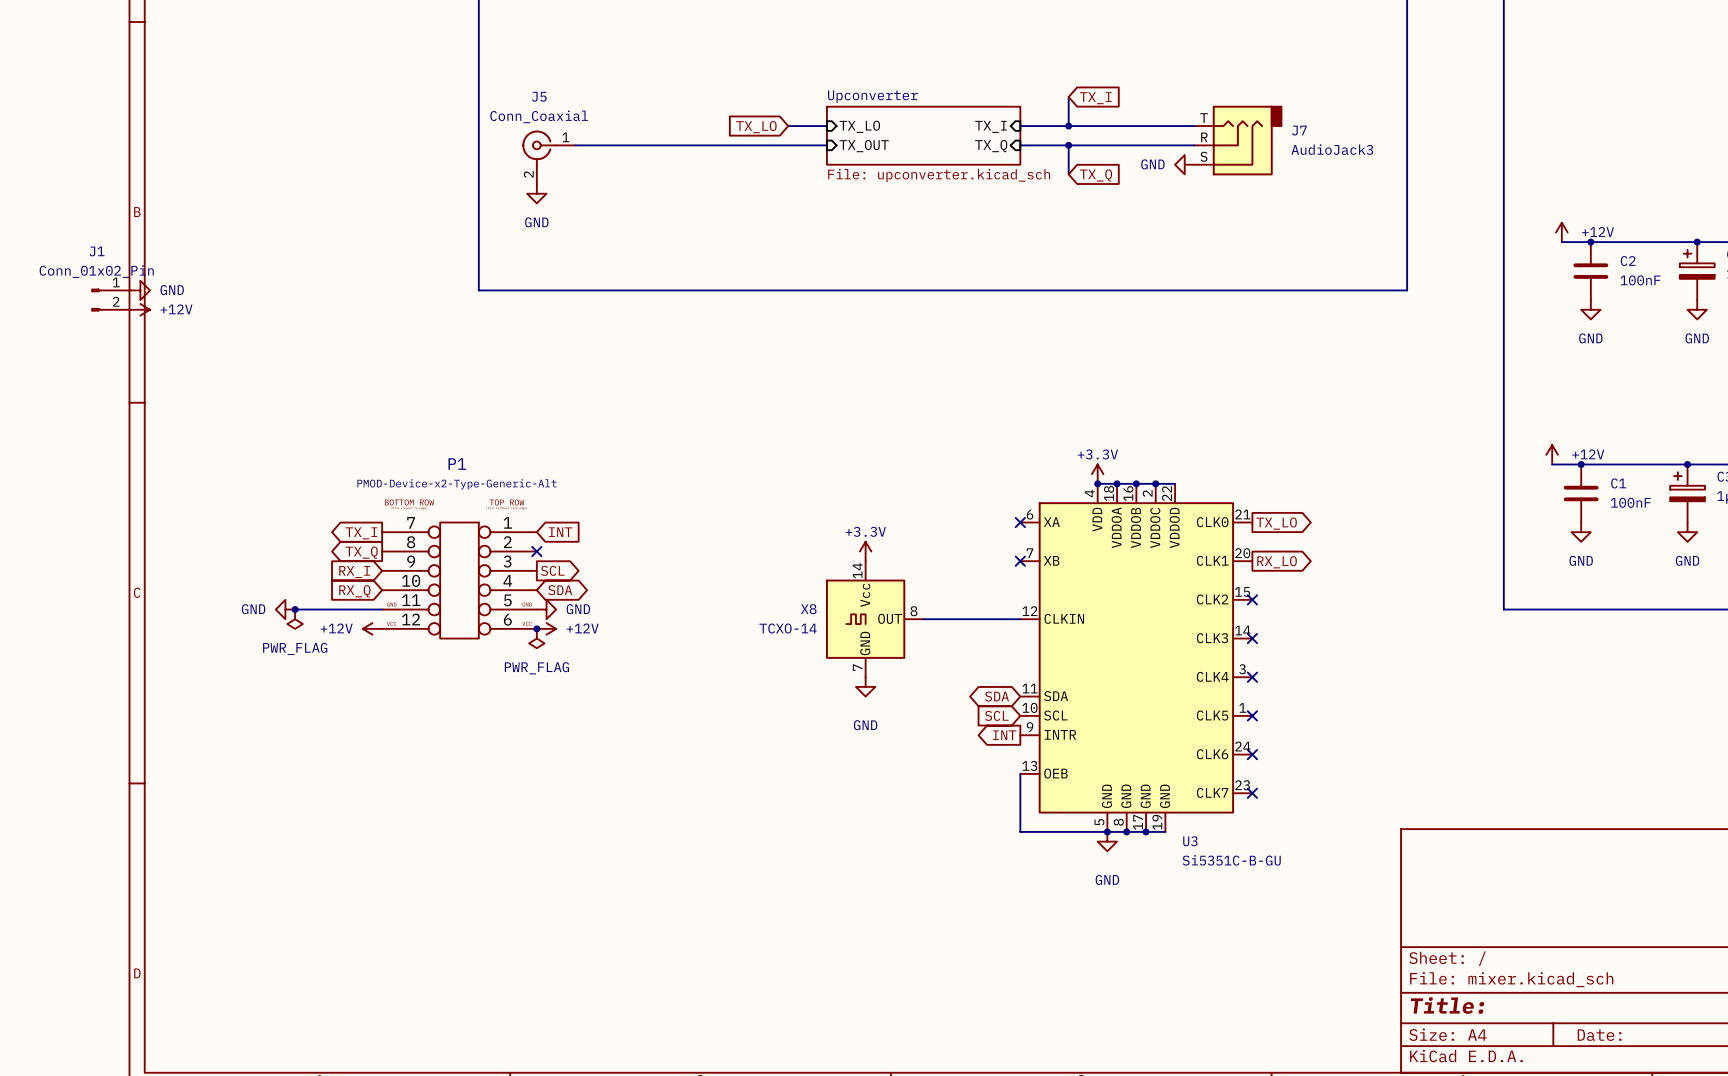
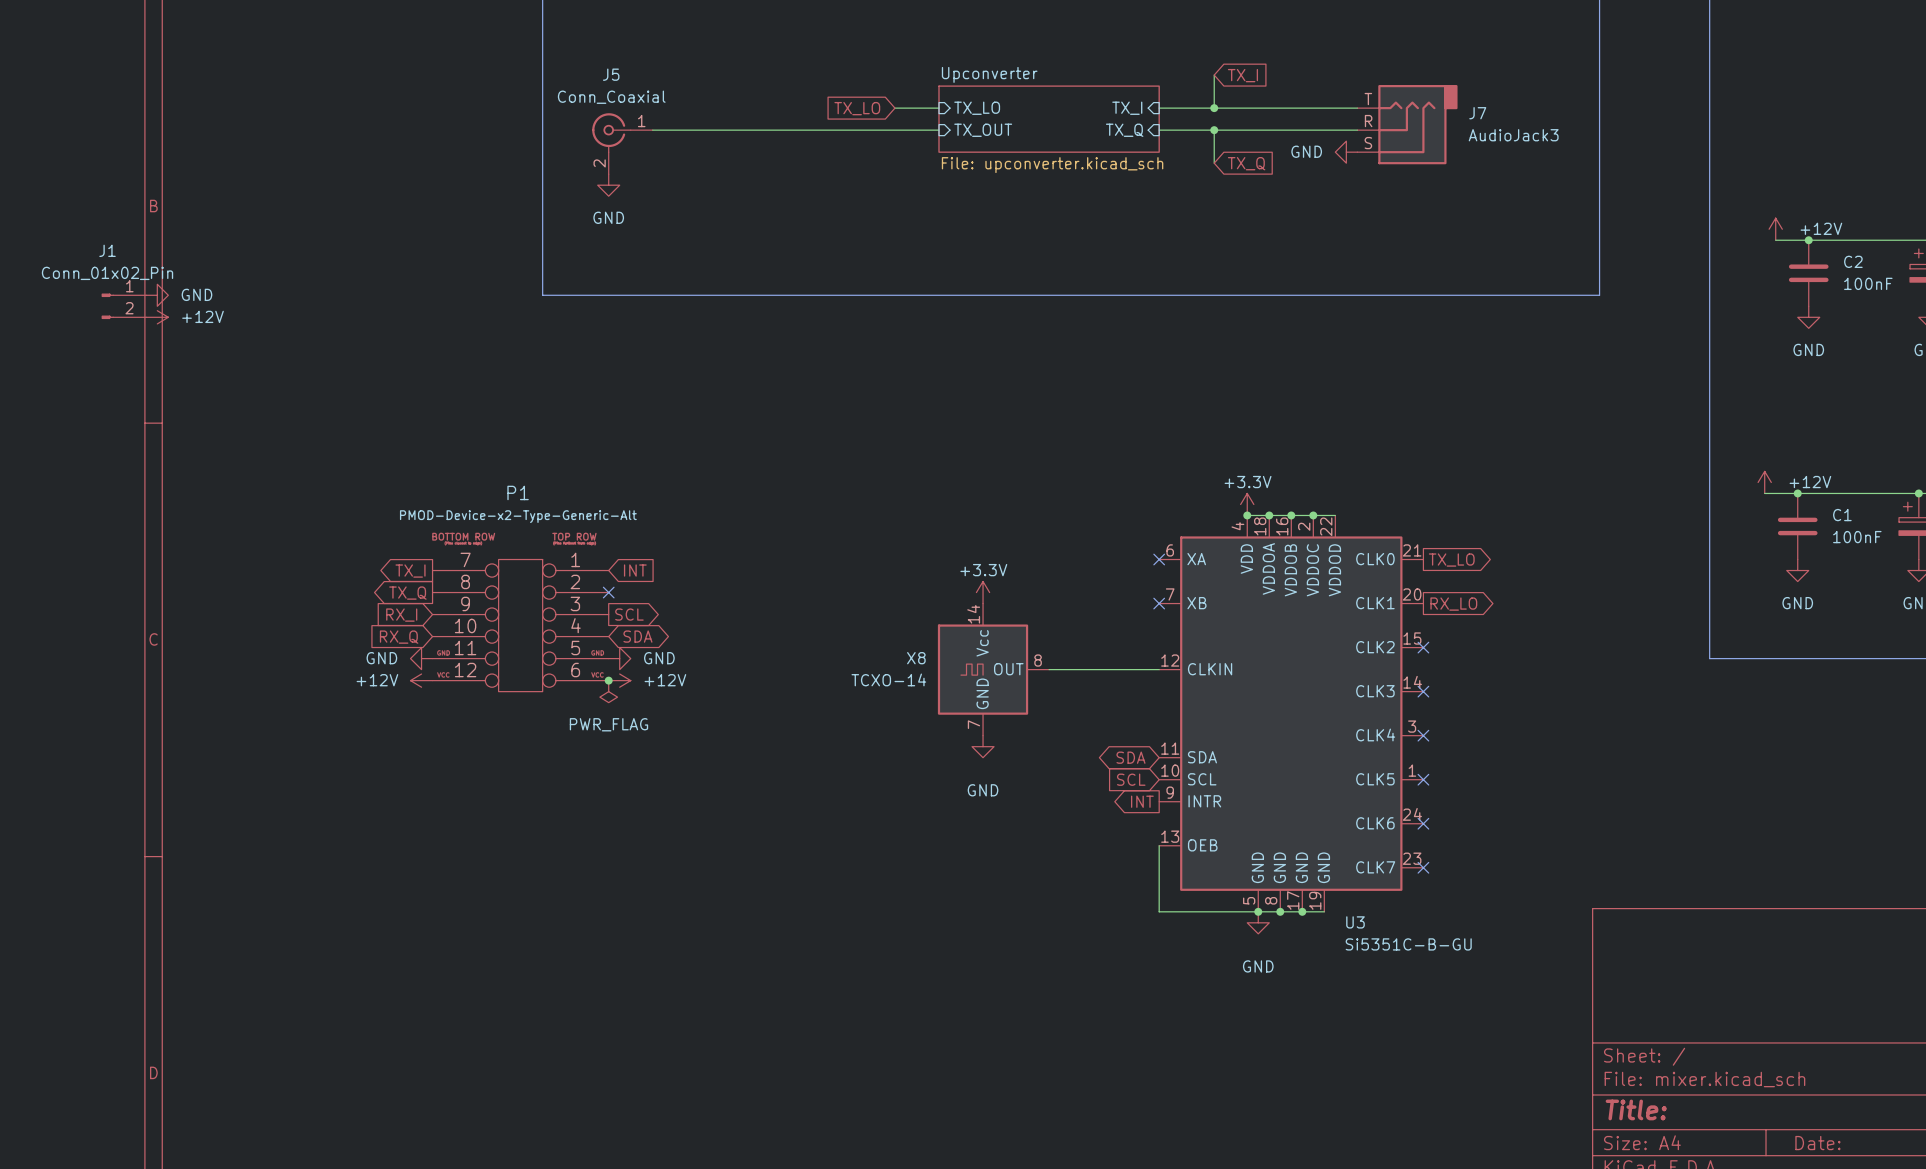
power symbol position: GND (285, 609) -> GND (421, 658)
wire: (295, 609) (382, 609) -> none
junction: (295, 609) -> none
power symbol: PWR_FLAG (295, 619) -> none

